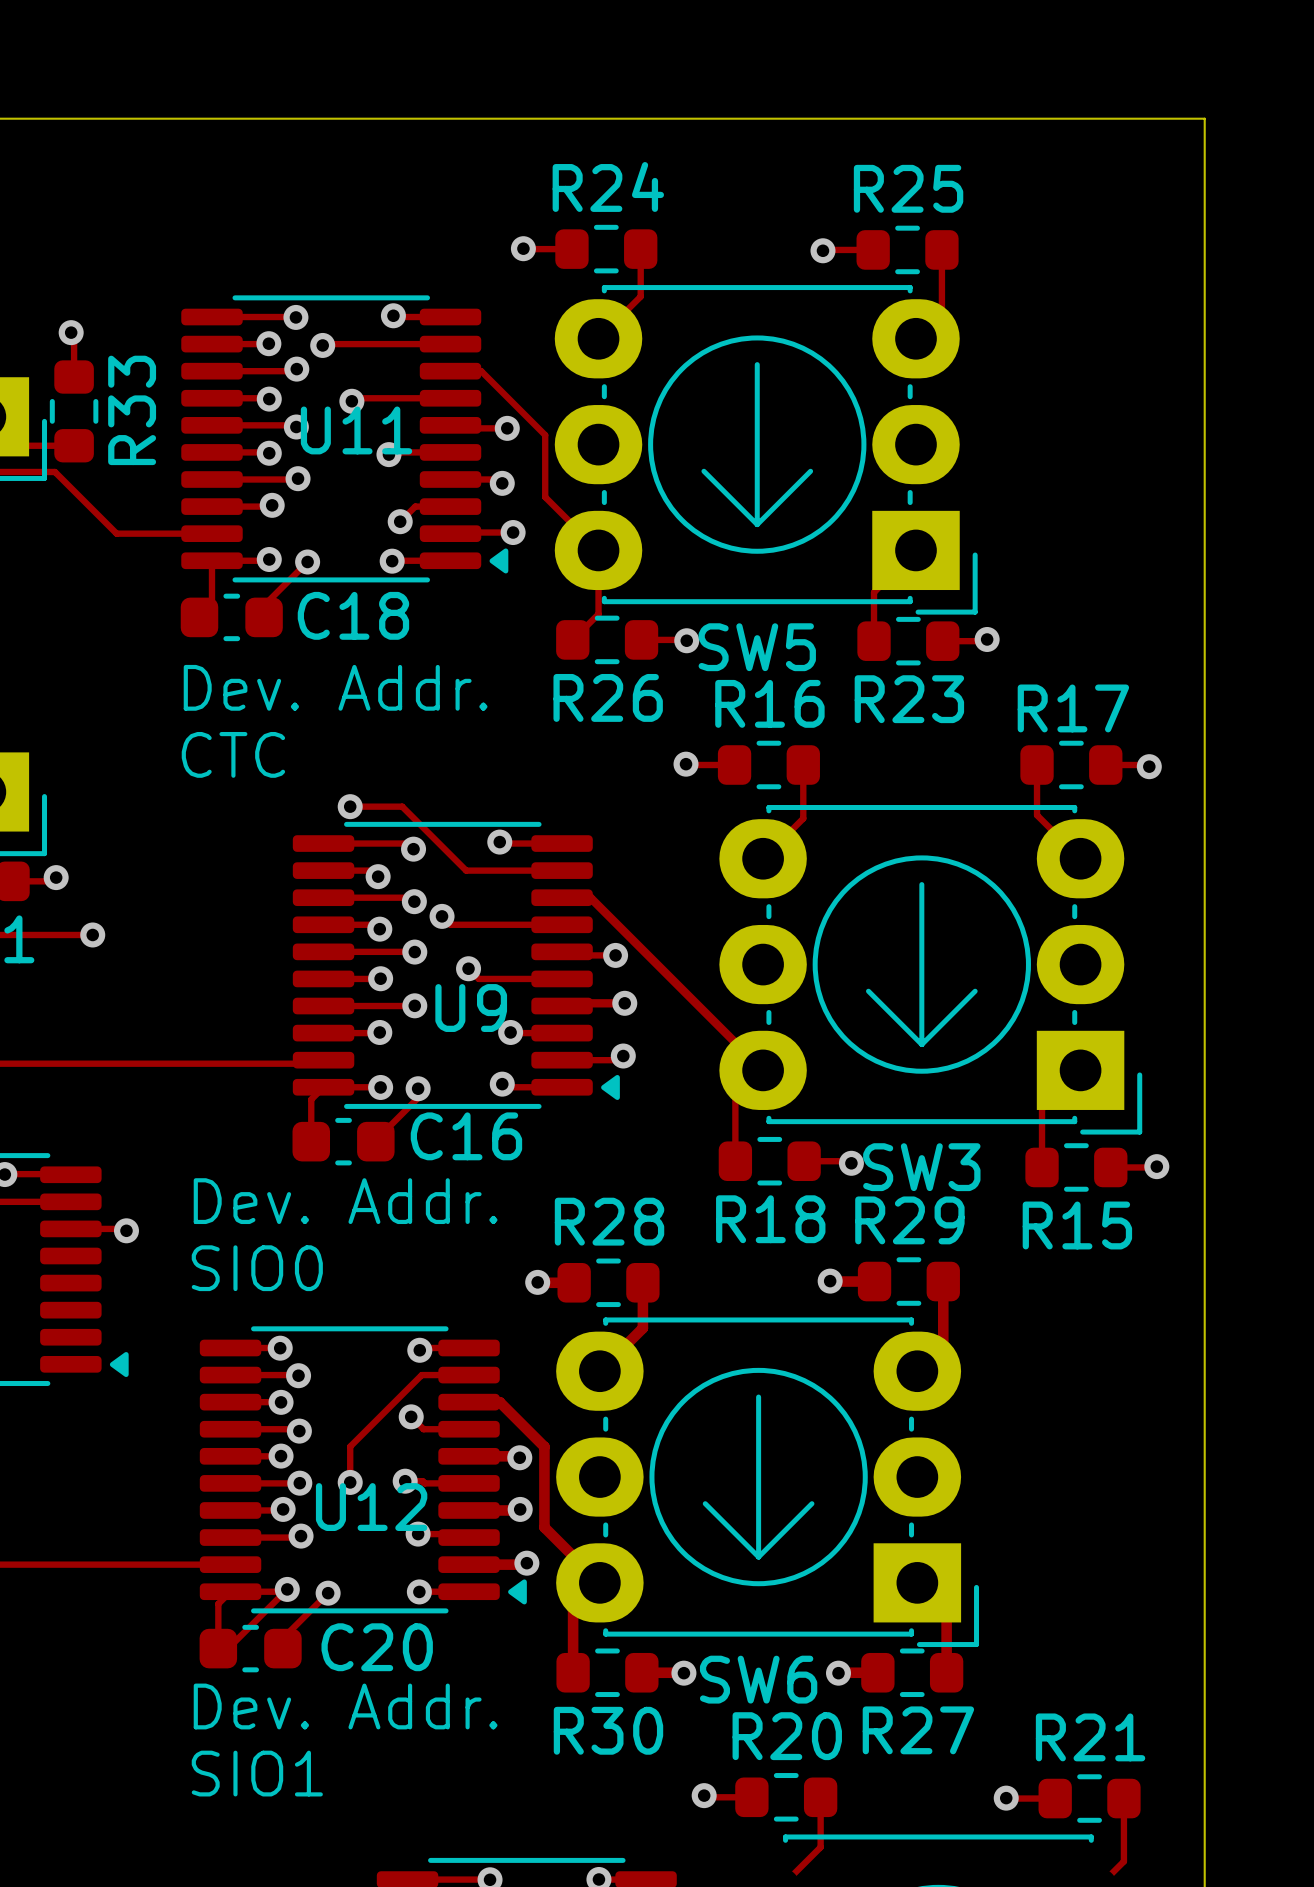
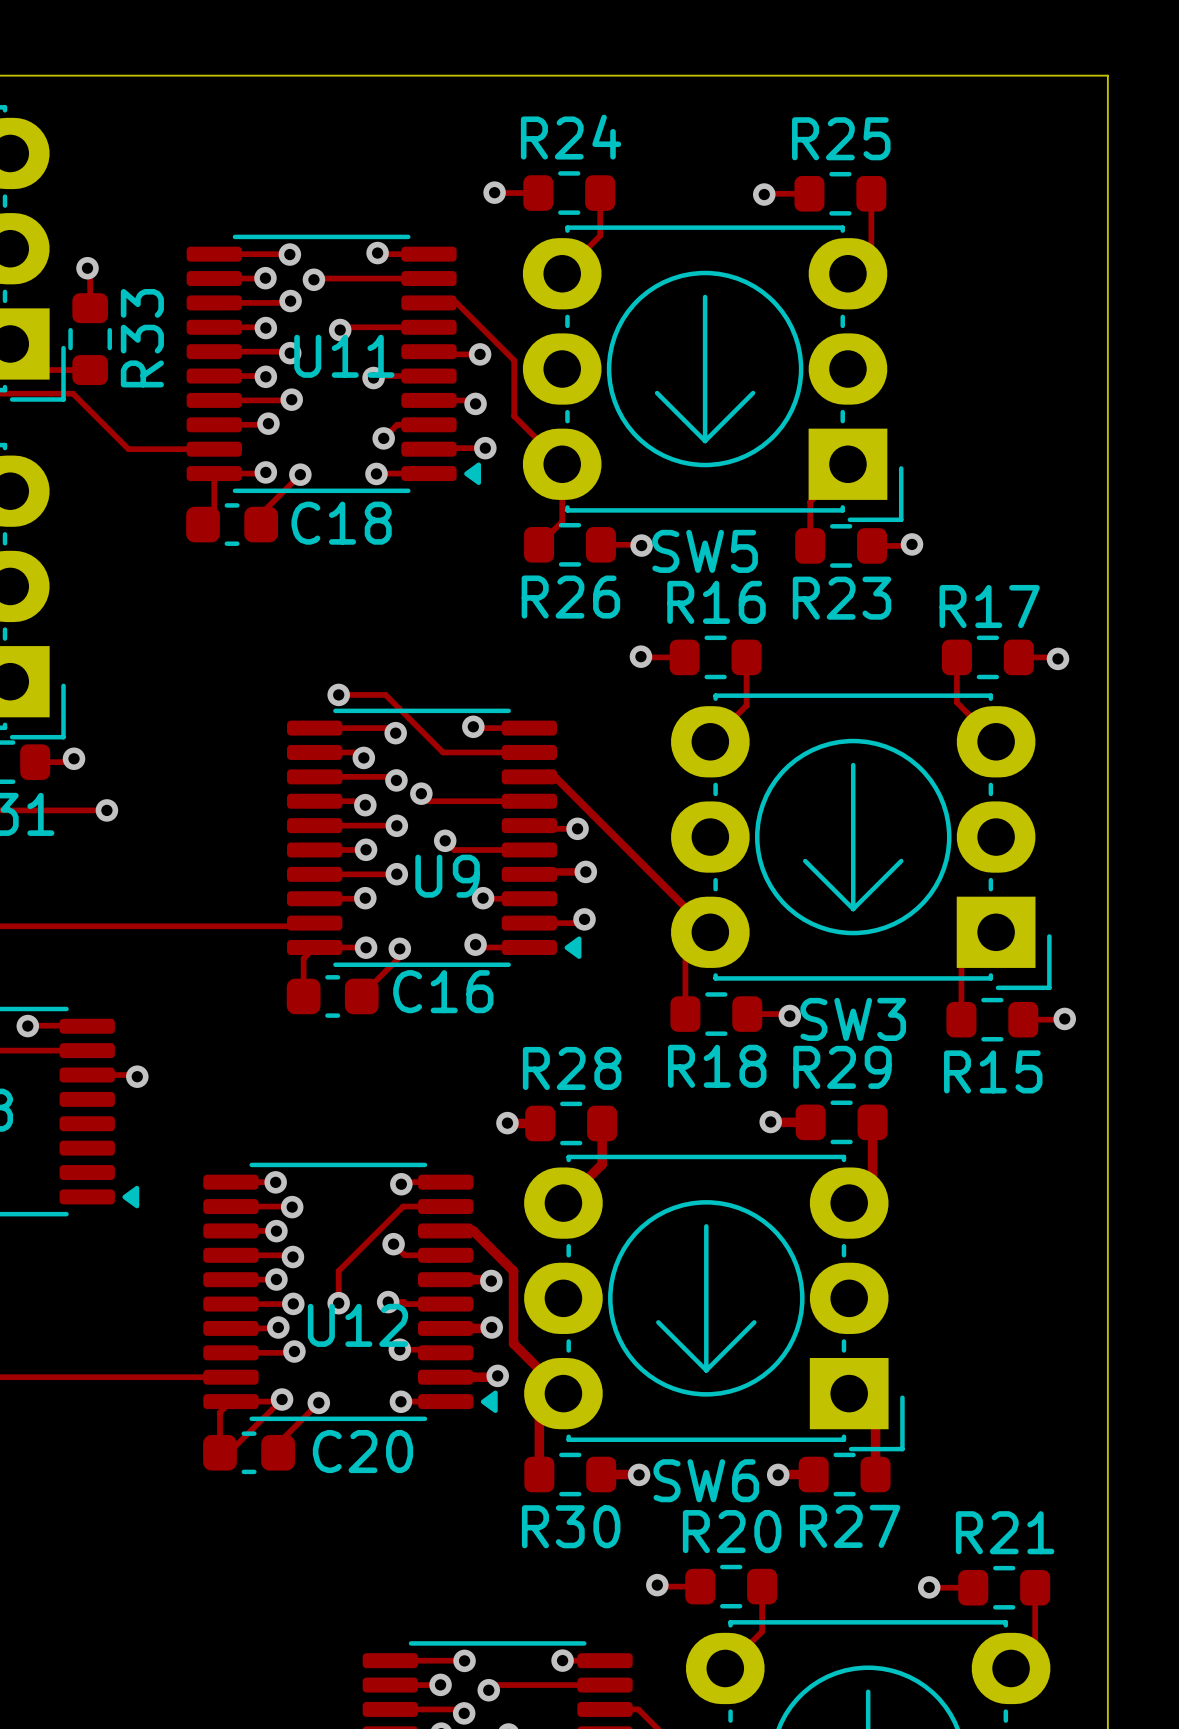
text: Dev. Addr. (335, 687) -> none
text: CTC (233, 754) -> none
text: Dev. Addr. (345, 1201) -> none
text: SIO0 (257, 1268) -> none
text: Dev. Addr. (345, 1706) -> none
text: SIO1 (257, 1773) -> none

